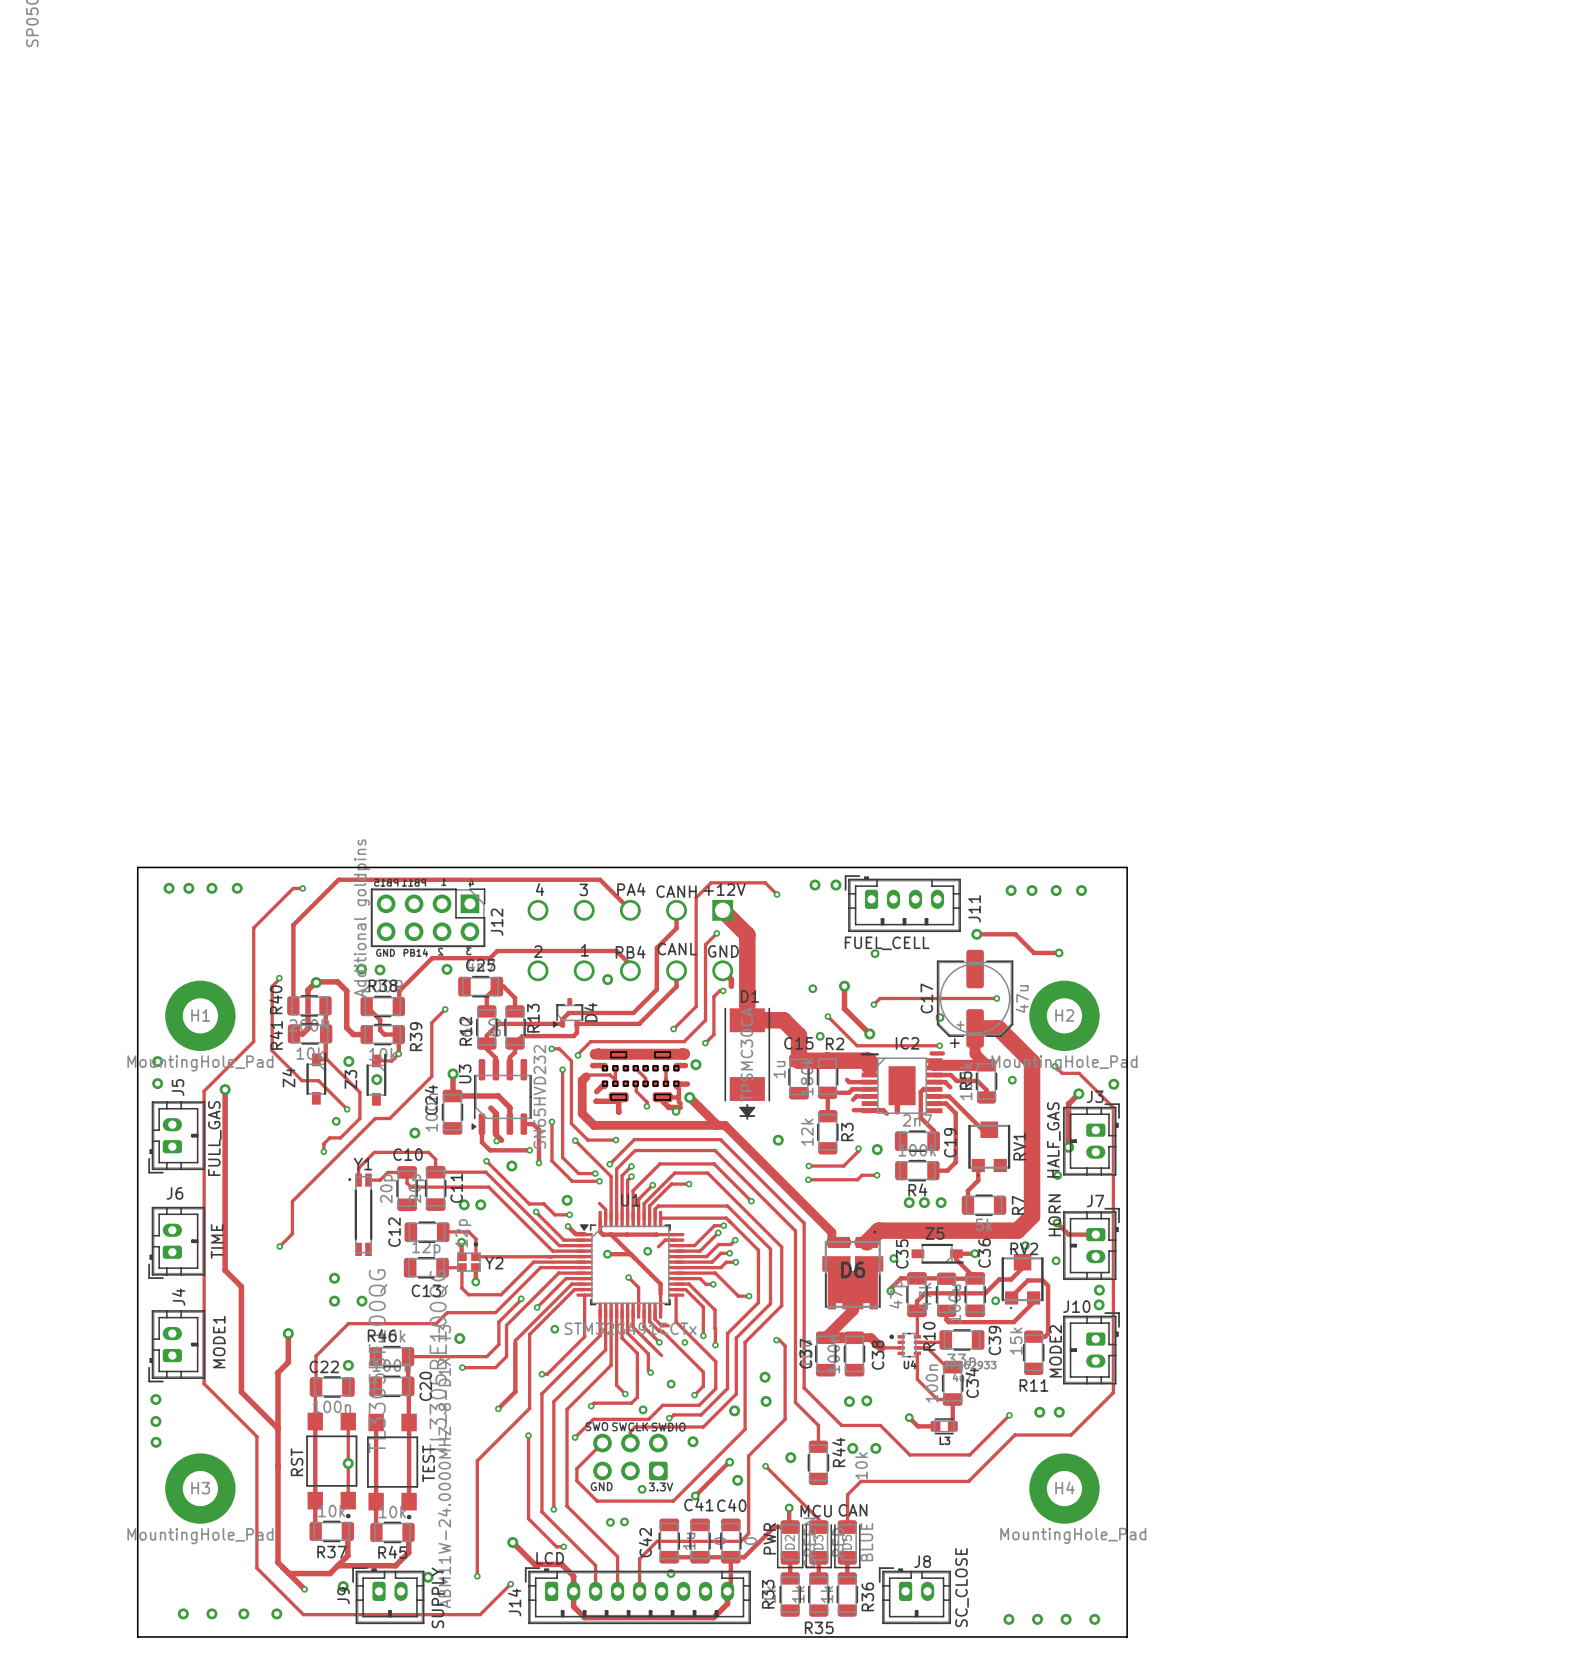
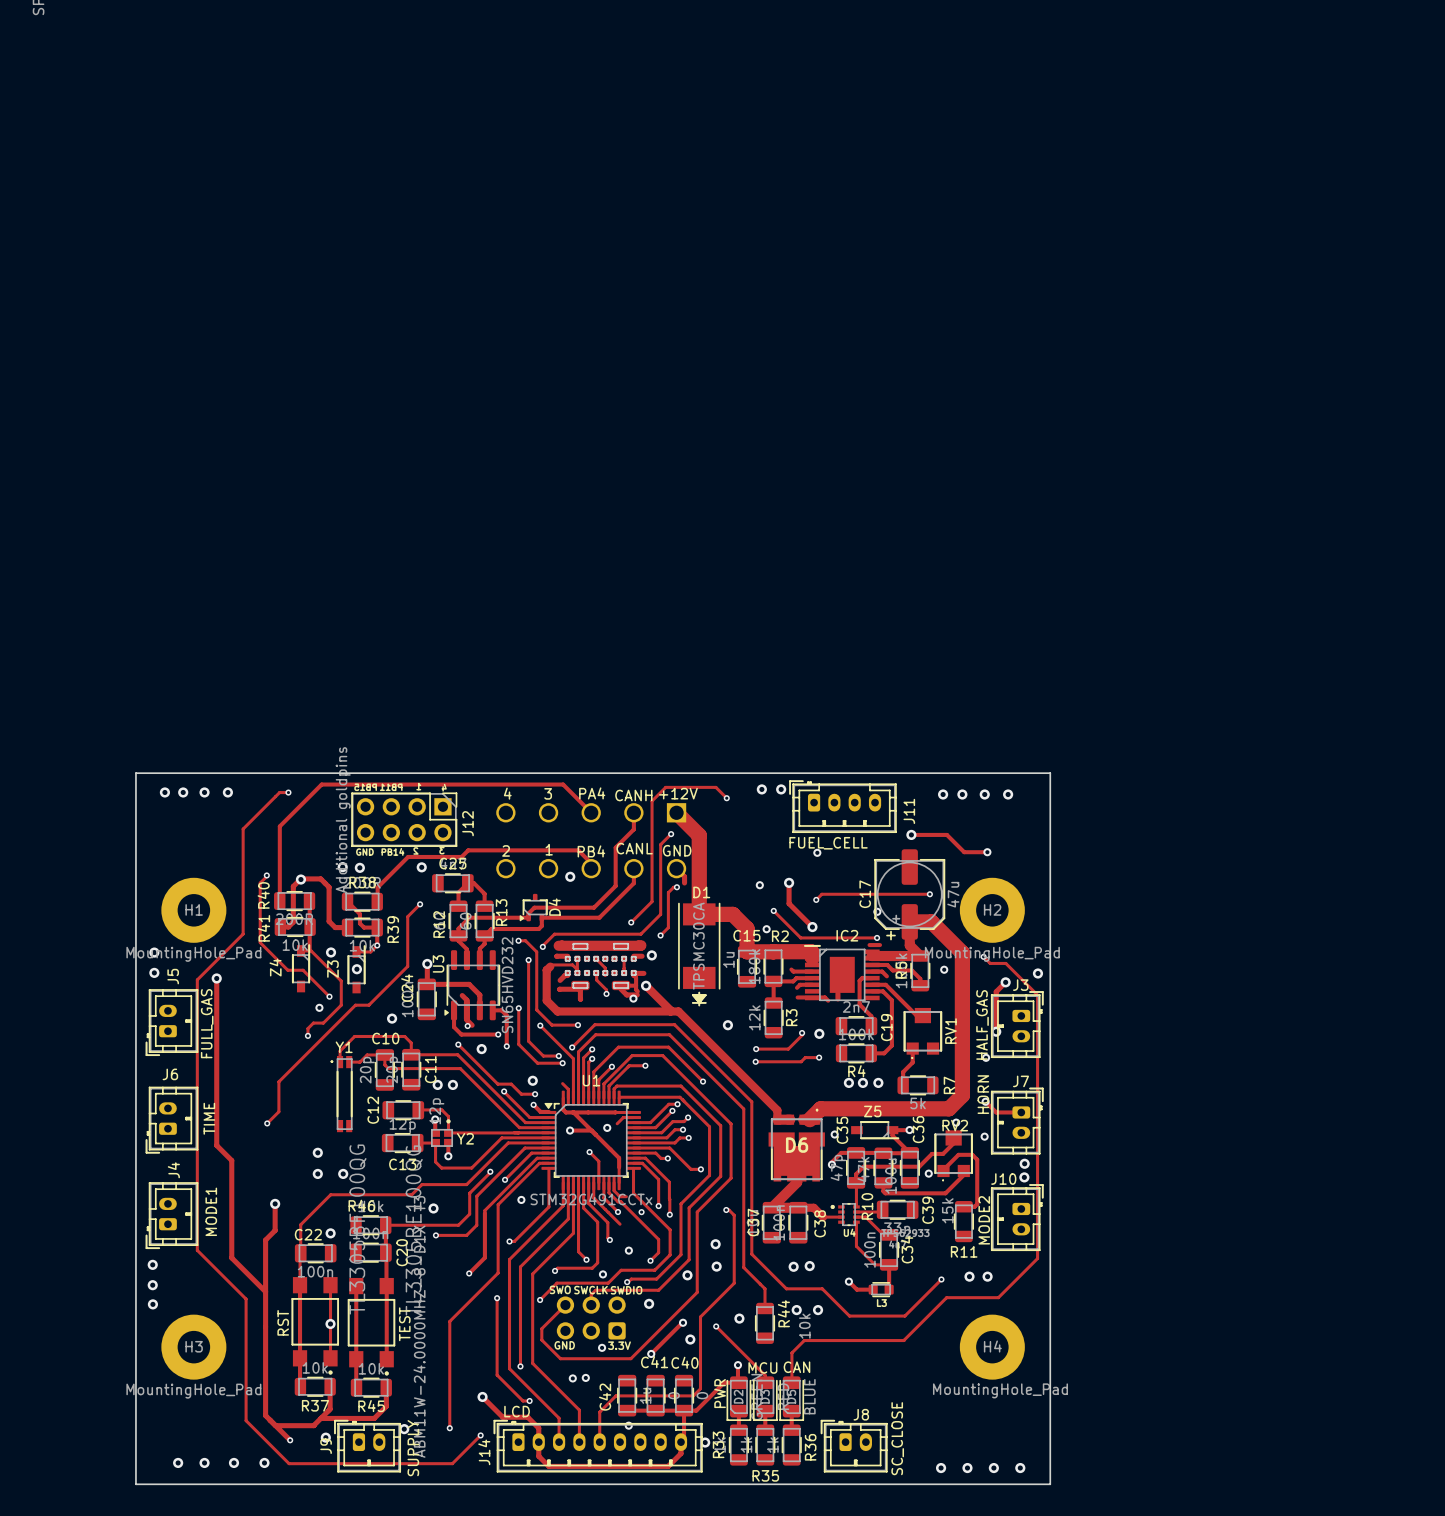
via: none -> (705, 1442)

